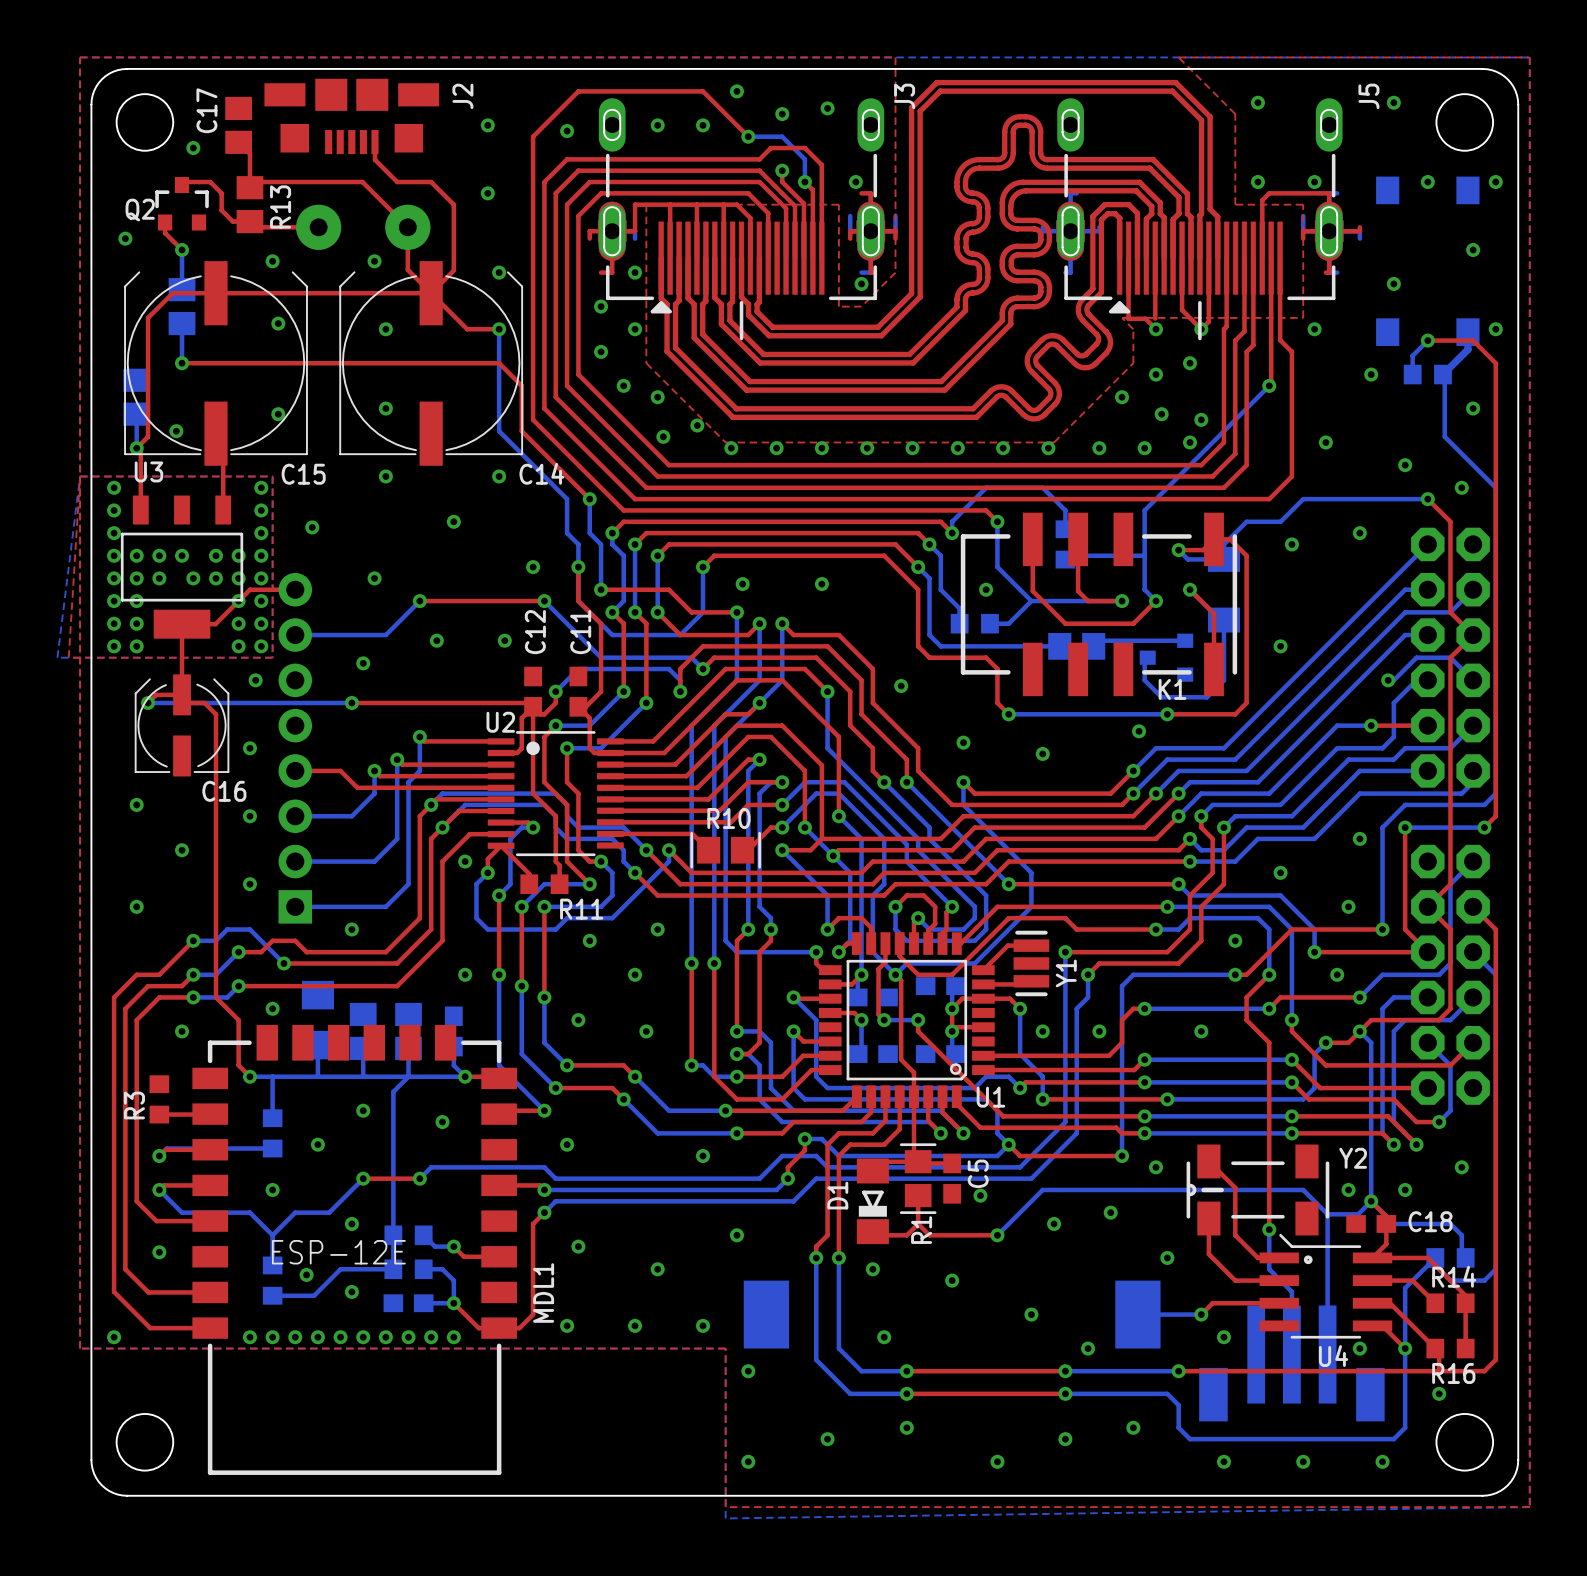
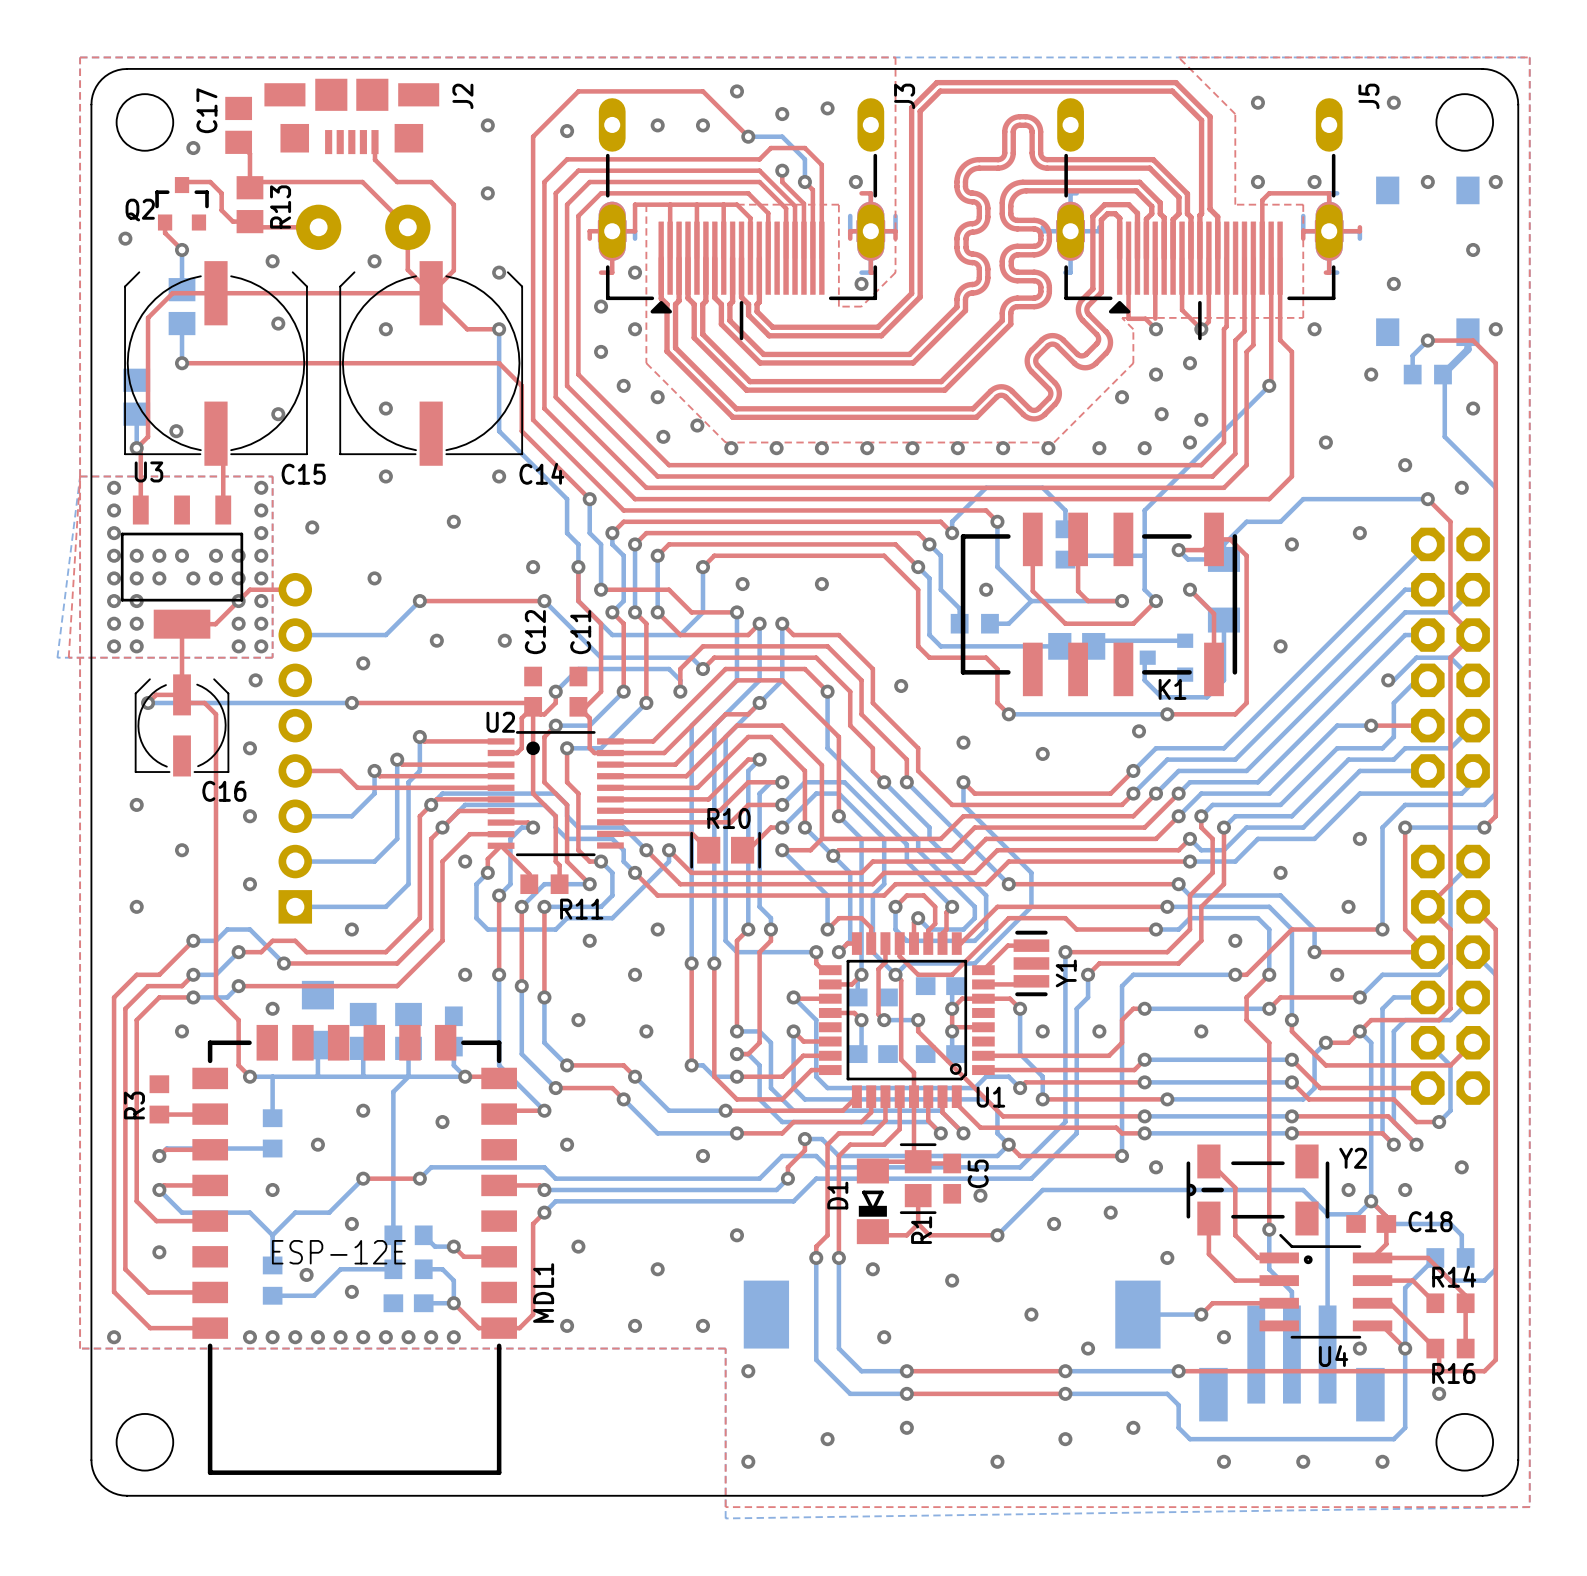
J3 footprint: [598, 98, 885, 341] -> [598, 98, 885, 341]
J5 footprint: [1057, 98, 1343, 341] -> [1057, 98, 1343, 341]

